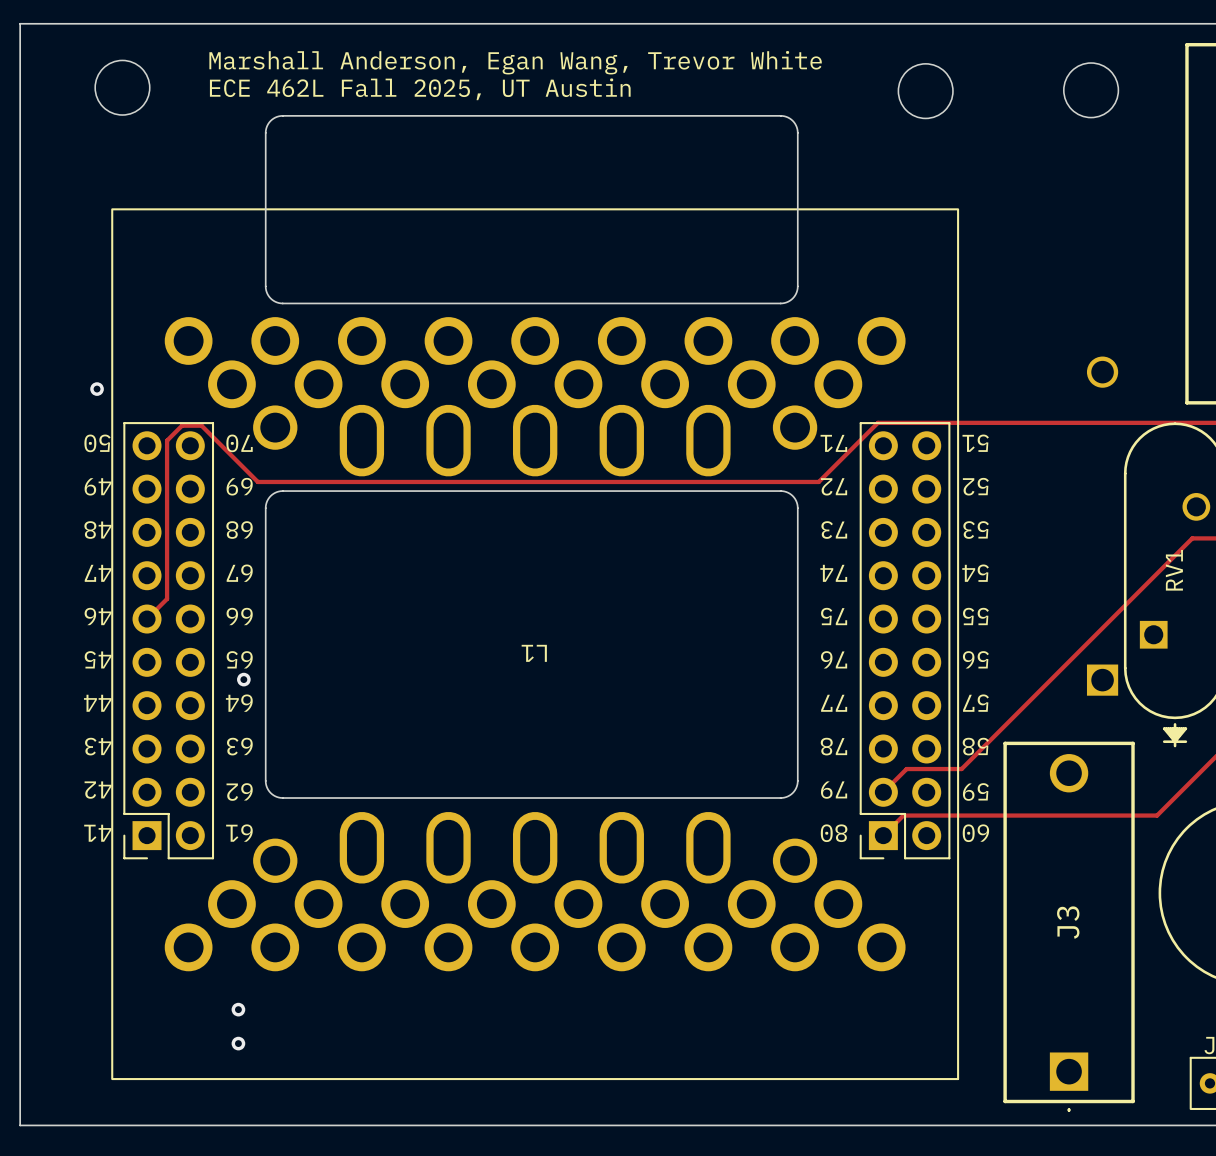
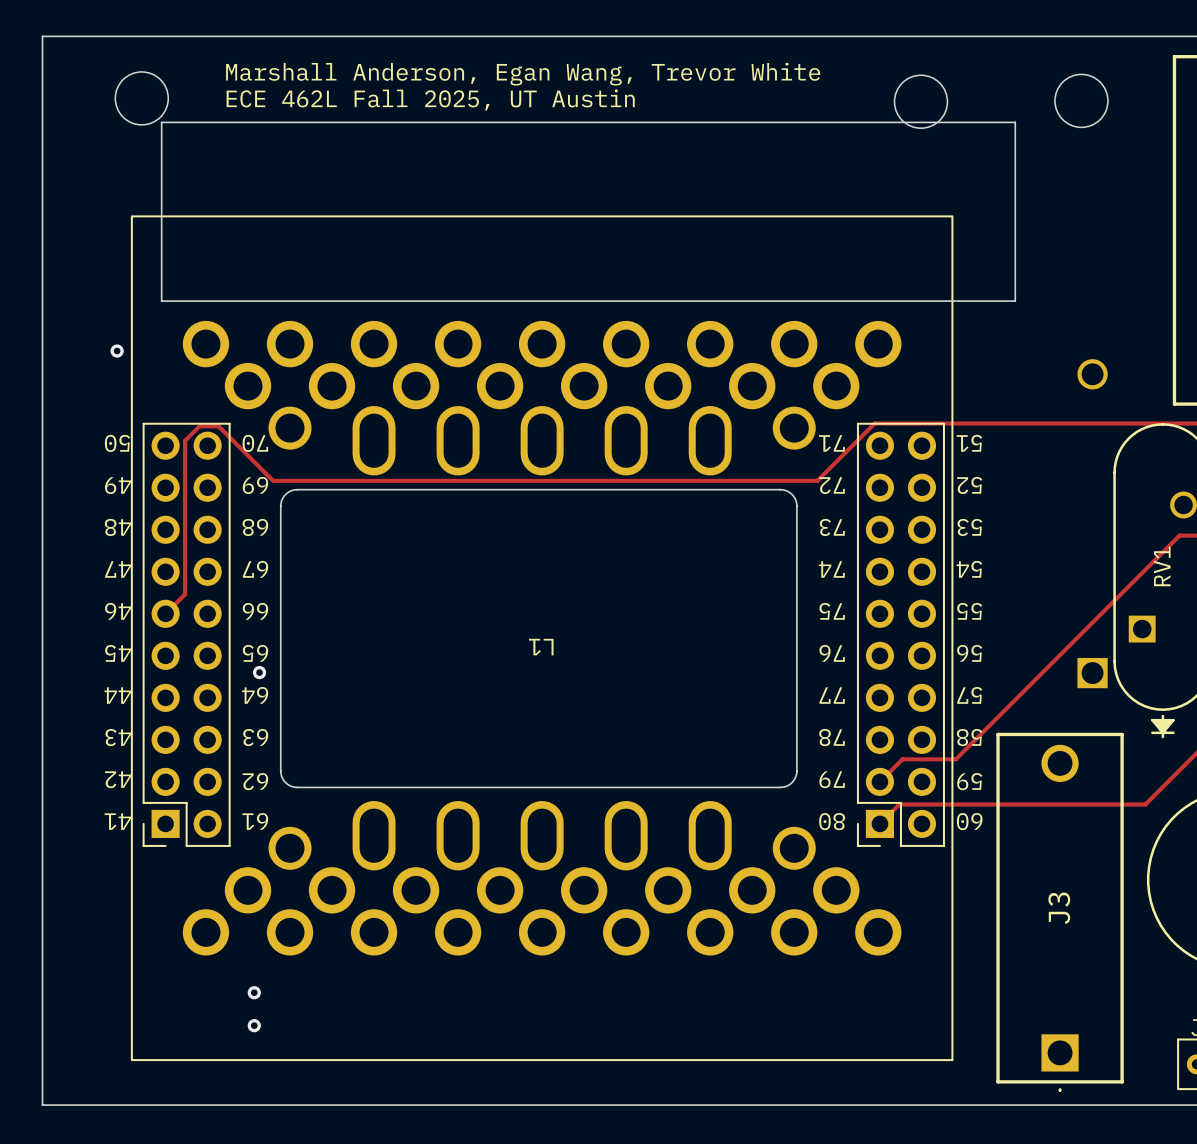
board edge: (282, 115) (786, 116) (794, 122) (797, 131) (796, 292) (791, 299) (780, 303) (277, 302) (269, 297) (265, 288) (265, 132) (270, 120) (282, 115) -> (161, 122) (161, 301) (1015, 301) (1015, 122) (161, 122)
via position: (97, 389) -> (117, 351)

